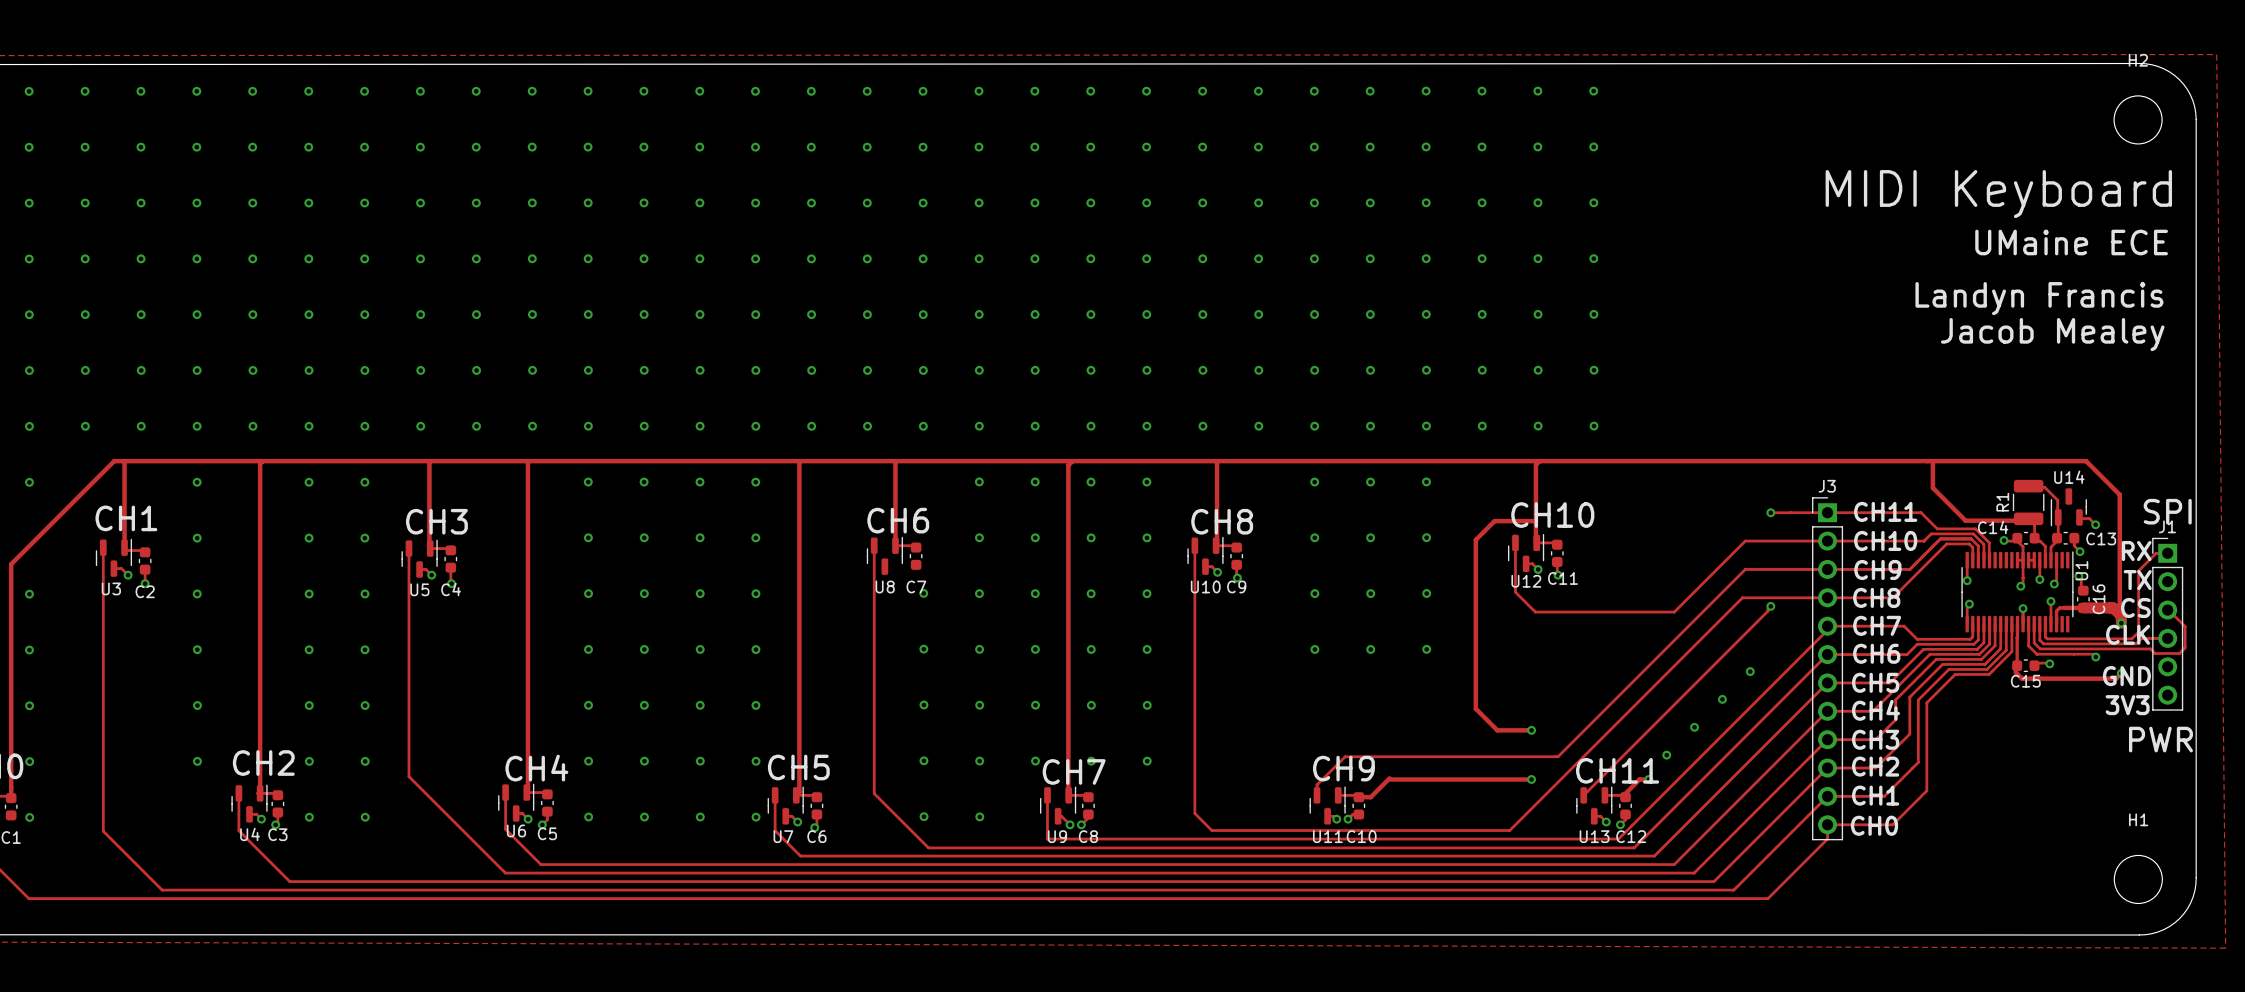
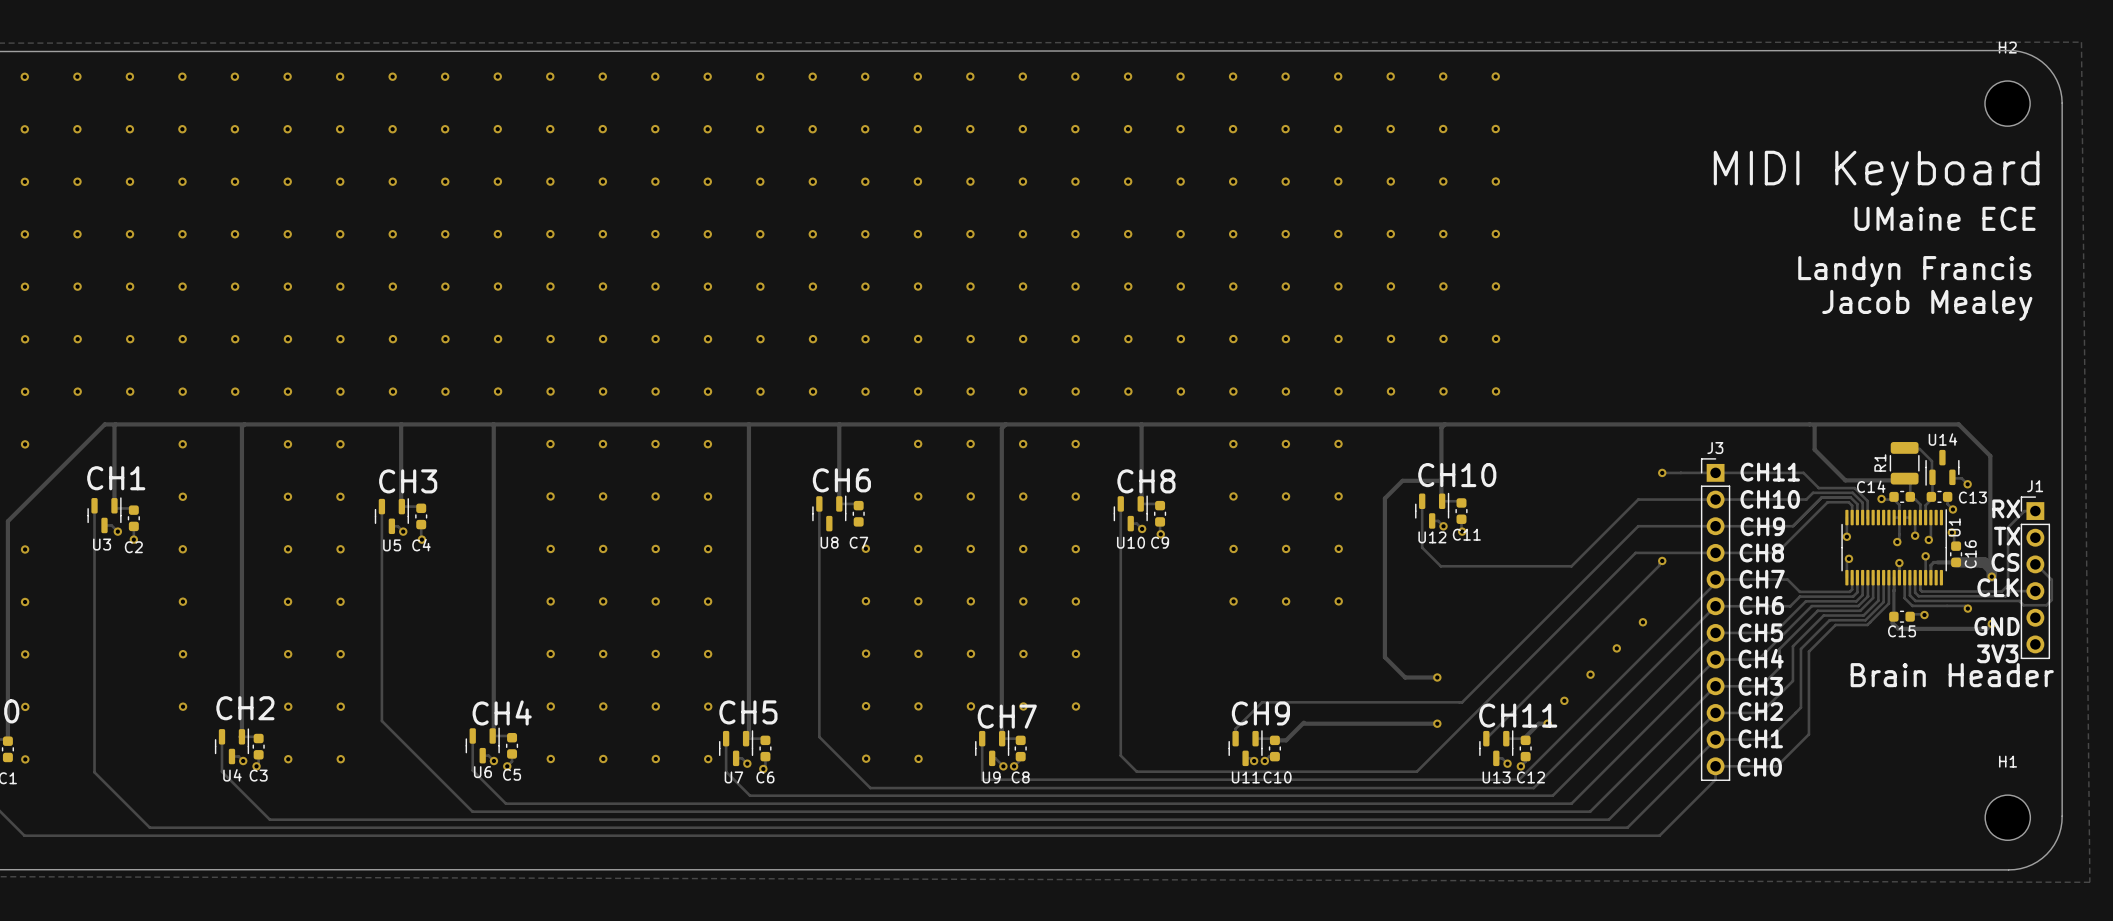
text: SPI (2167, 511) -> none
text: none -> Brain Header (1952, 675)
text: PWR (2160, 739) -> none

